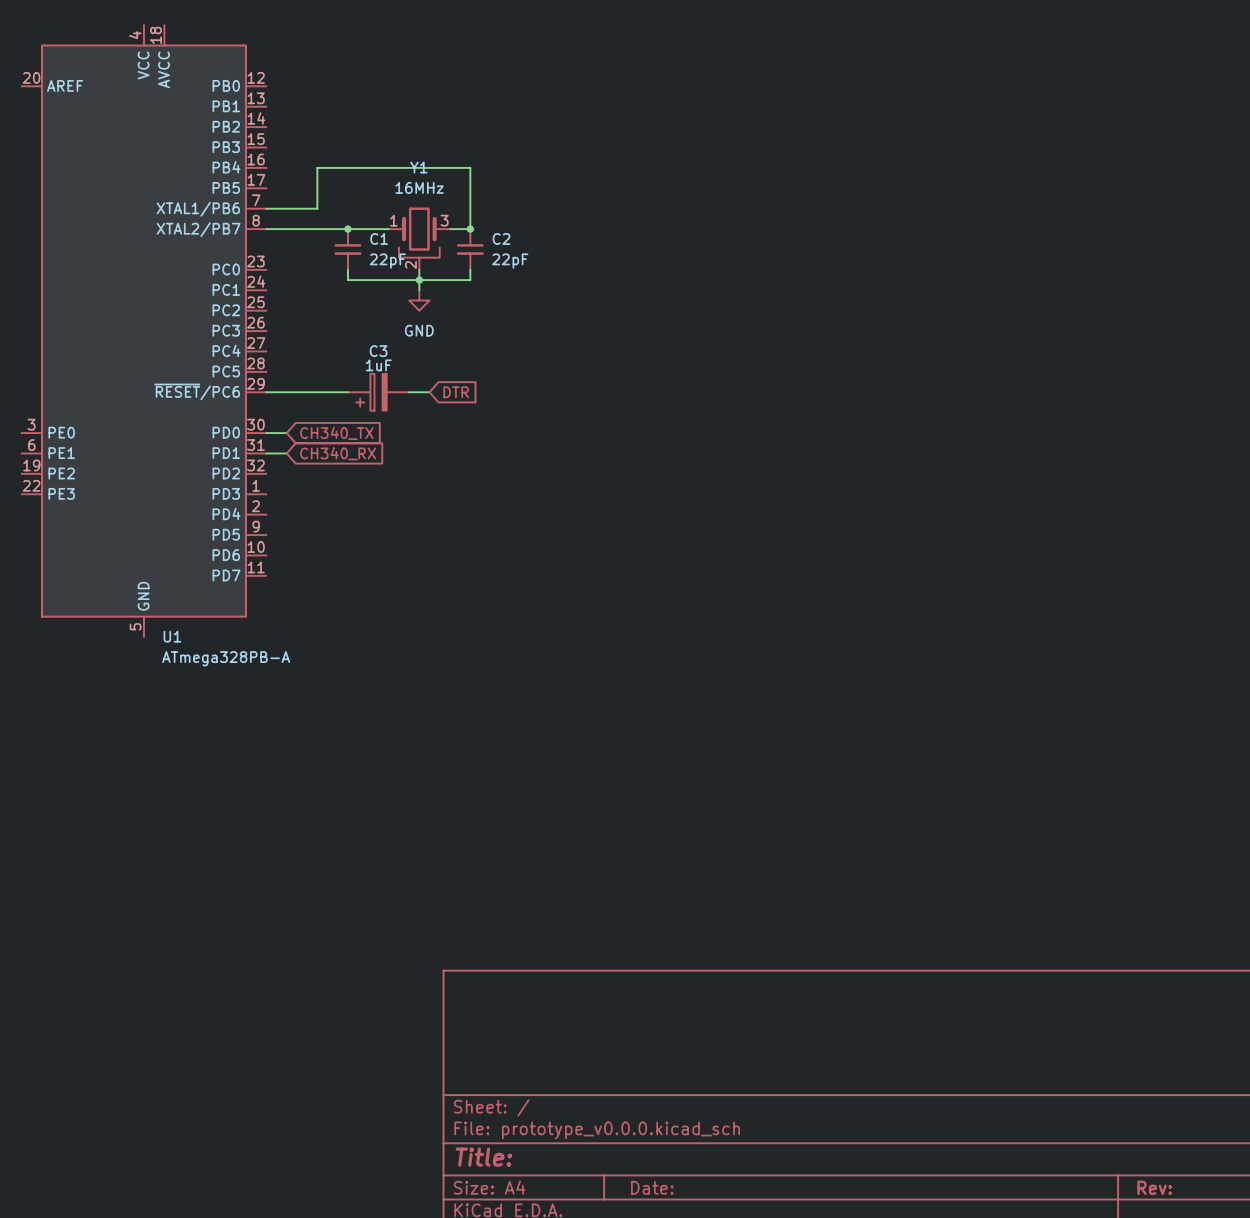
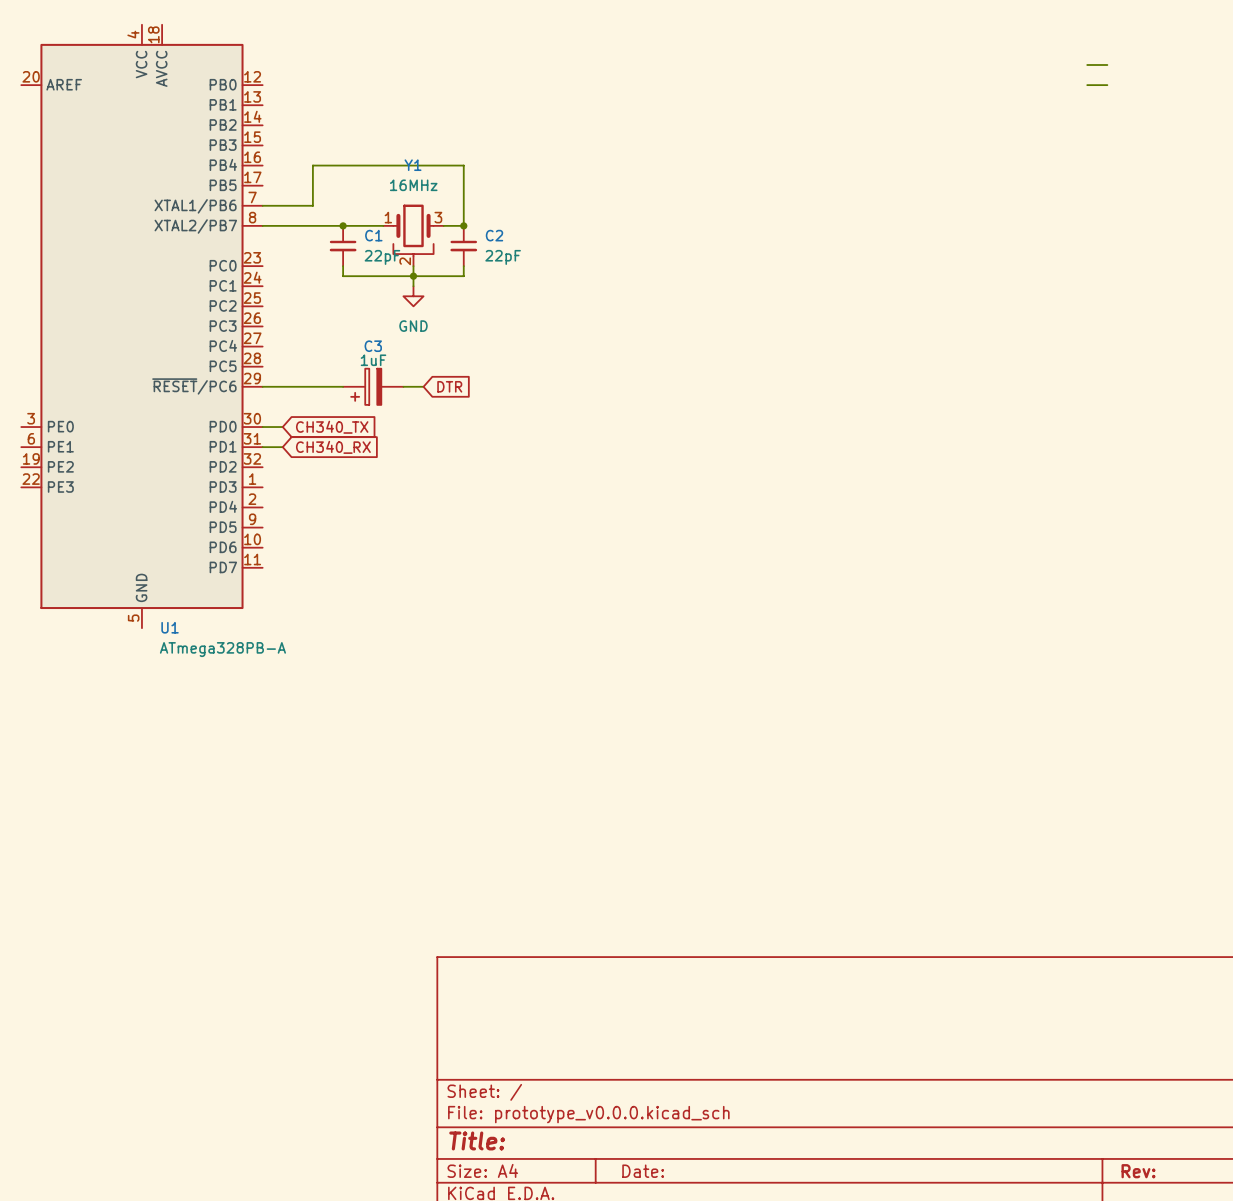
wire: none -> (1087, 65) (1107, 65)
wire: none -> (1087, 85) (1107, 85)

